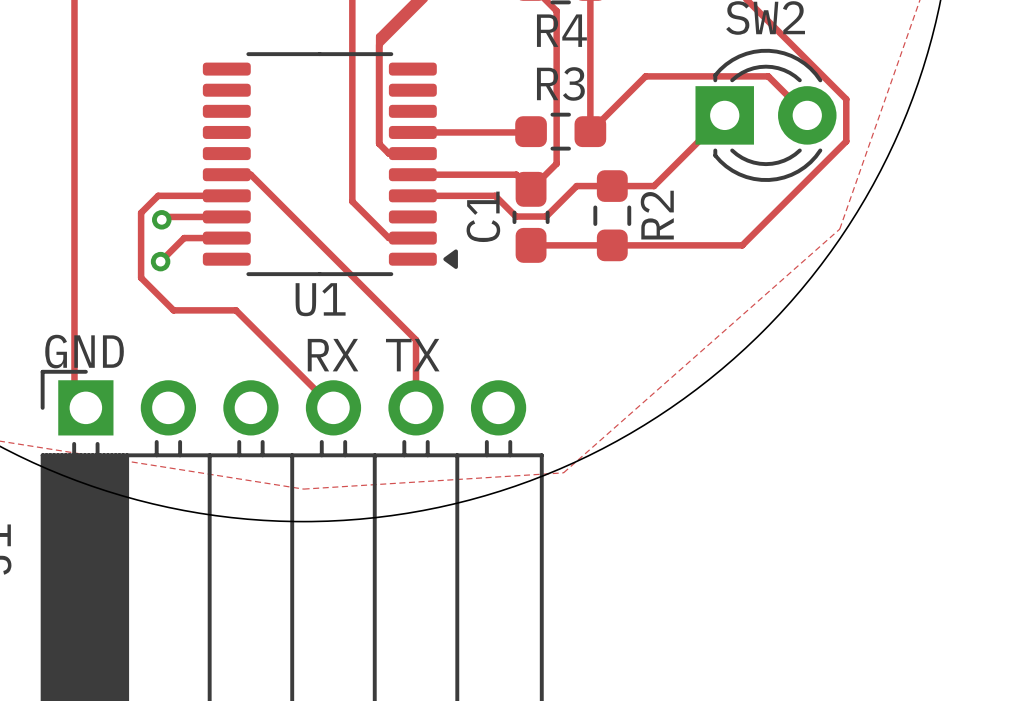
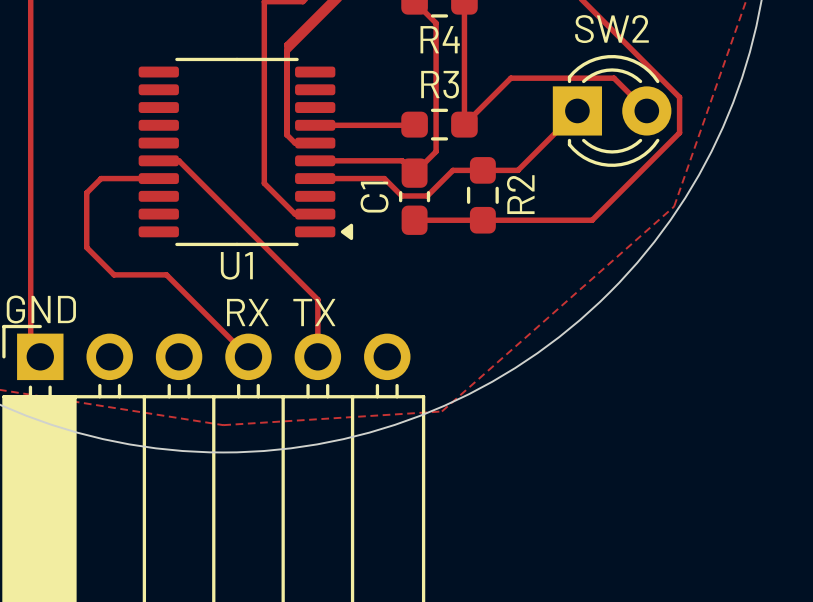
track: (226, 216) (164, 216) (161, 219) -> none
via: (161, 219) -> none
track: (226, 238) (184, 238) (160, 261) -> none
via: (160, 261) -> none

